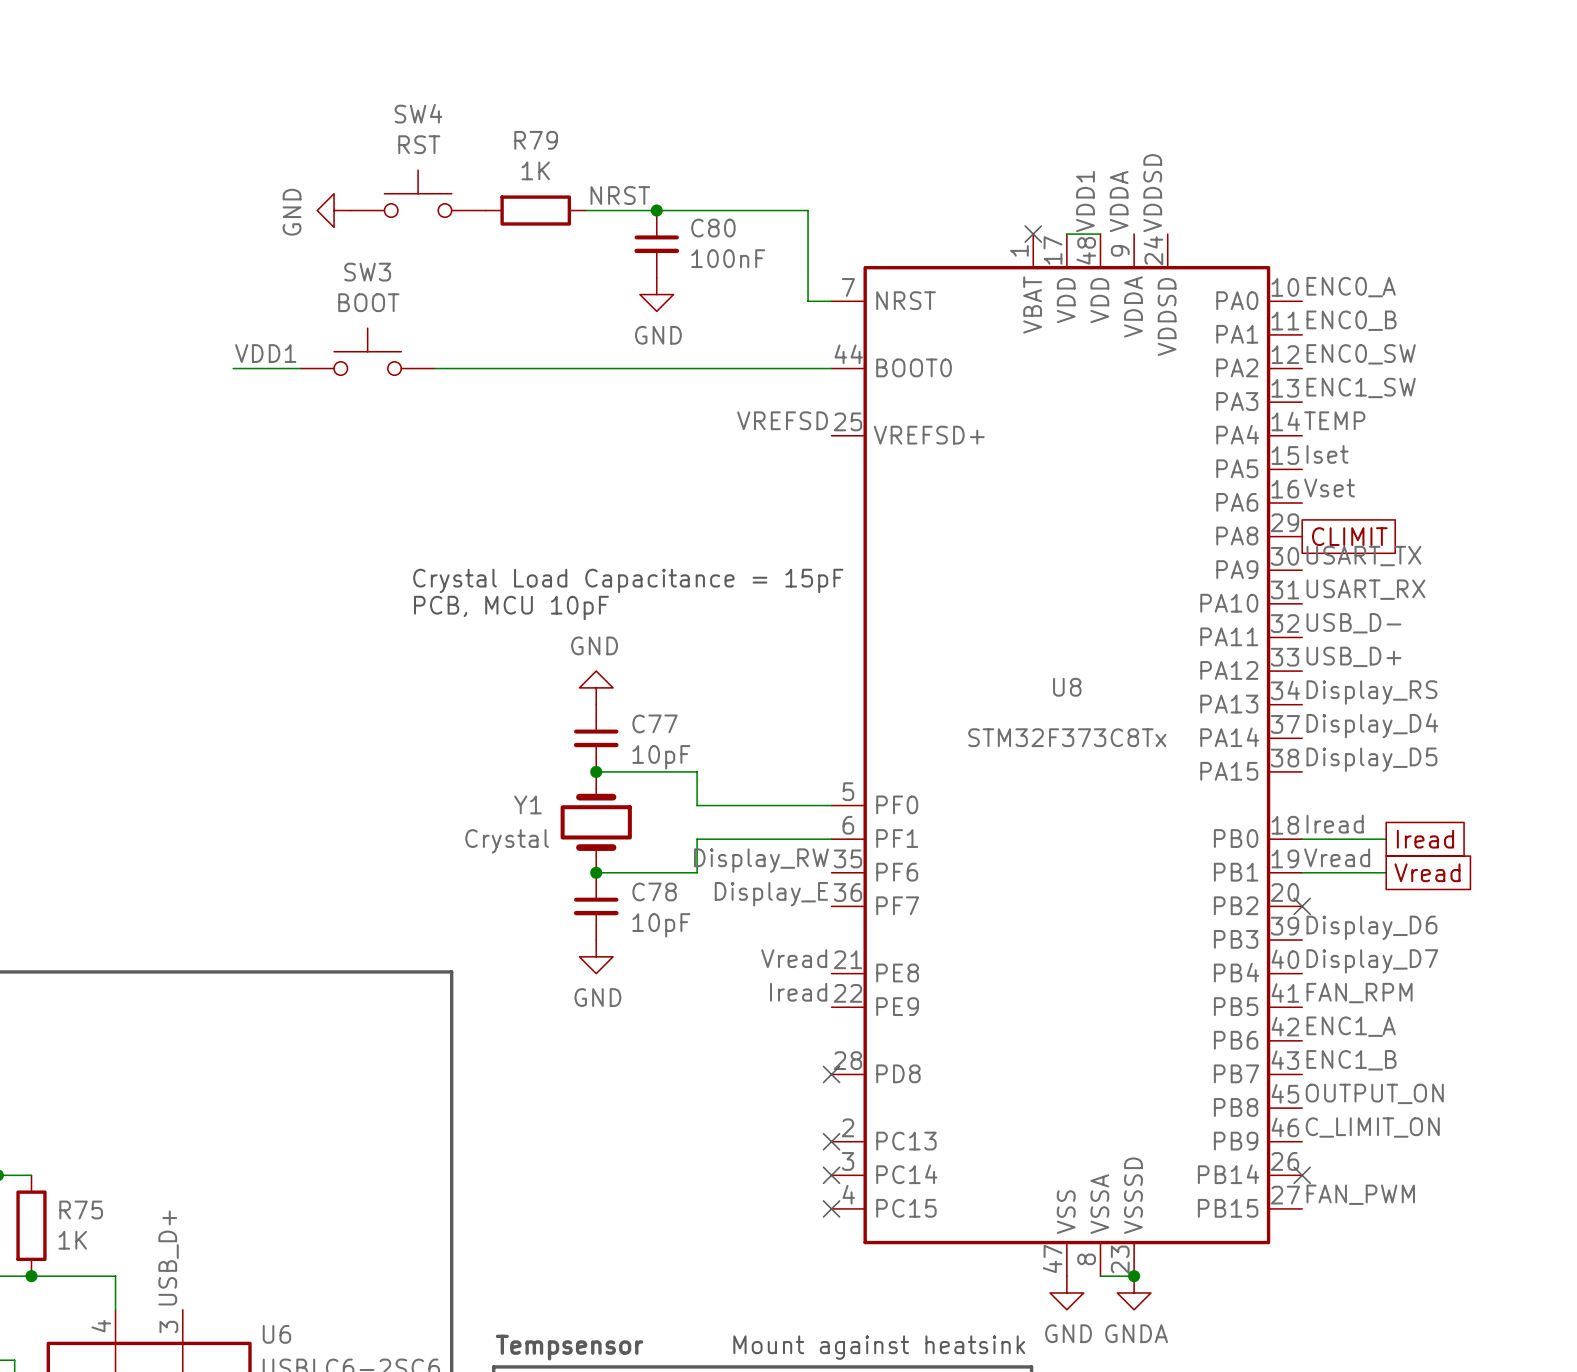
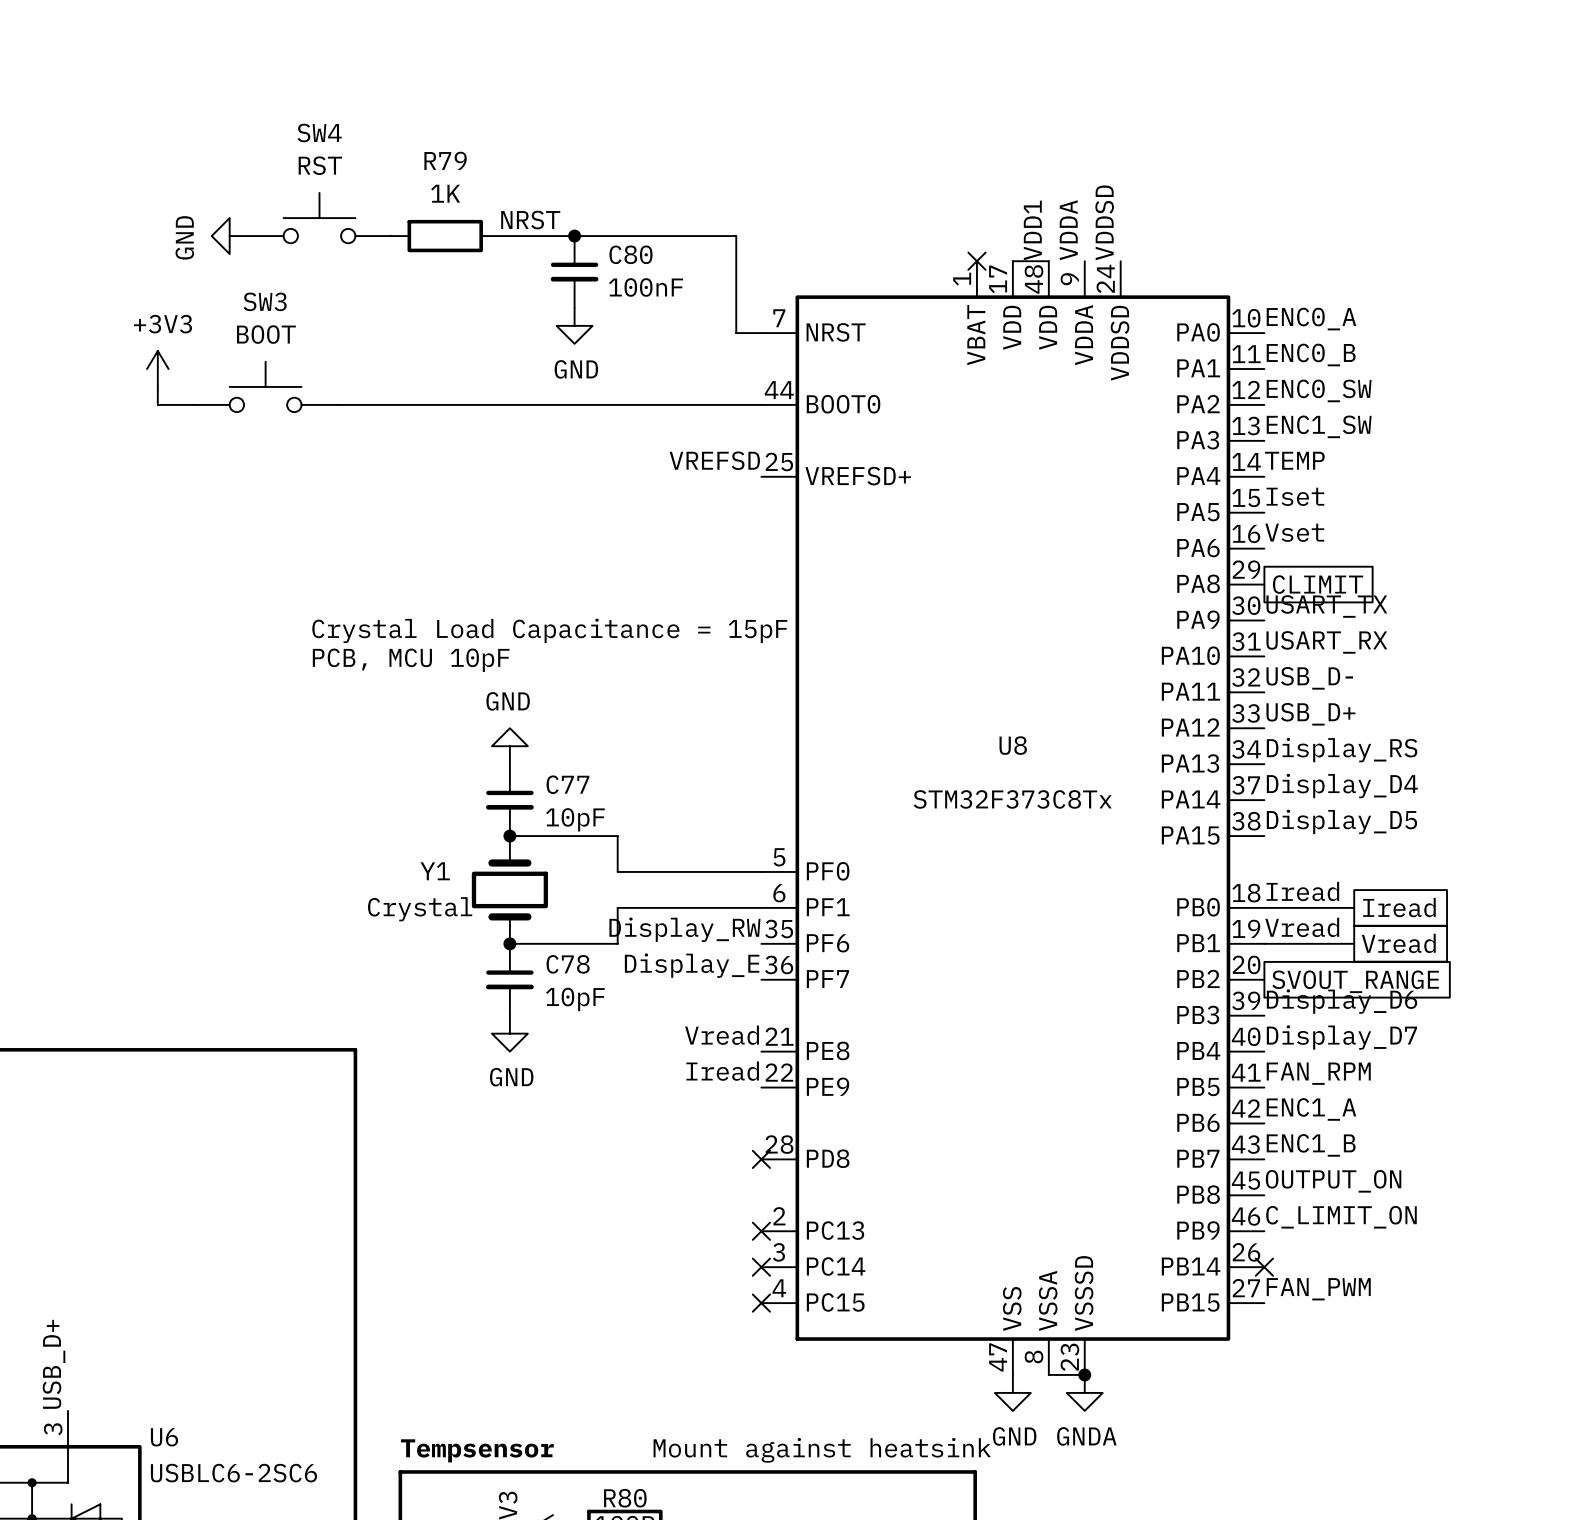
power symbol: none -> +3V3 (157, 368)
label: VDD1 (265, 353) -> none
wire: (233, 368) (266, 368) -> (157, 386) (157, 404)
no-connect mark: (1302, 906) -> none
global label: none -> SVOUT_RANGE (1355, 981)

